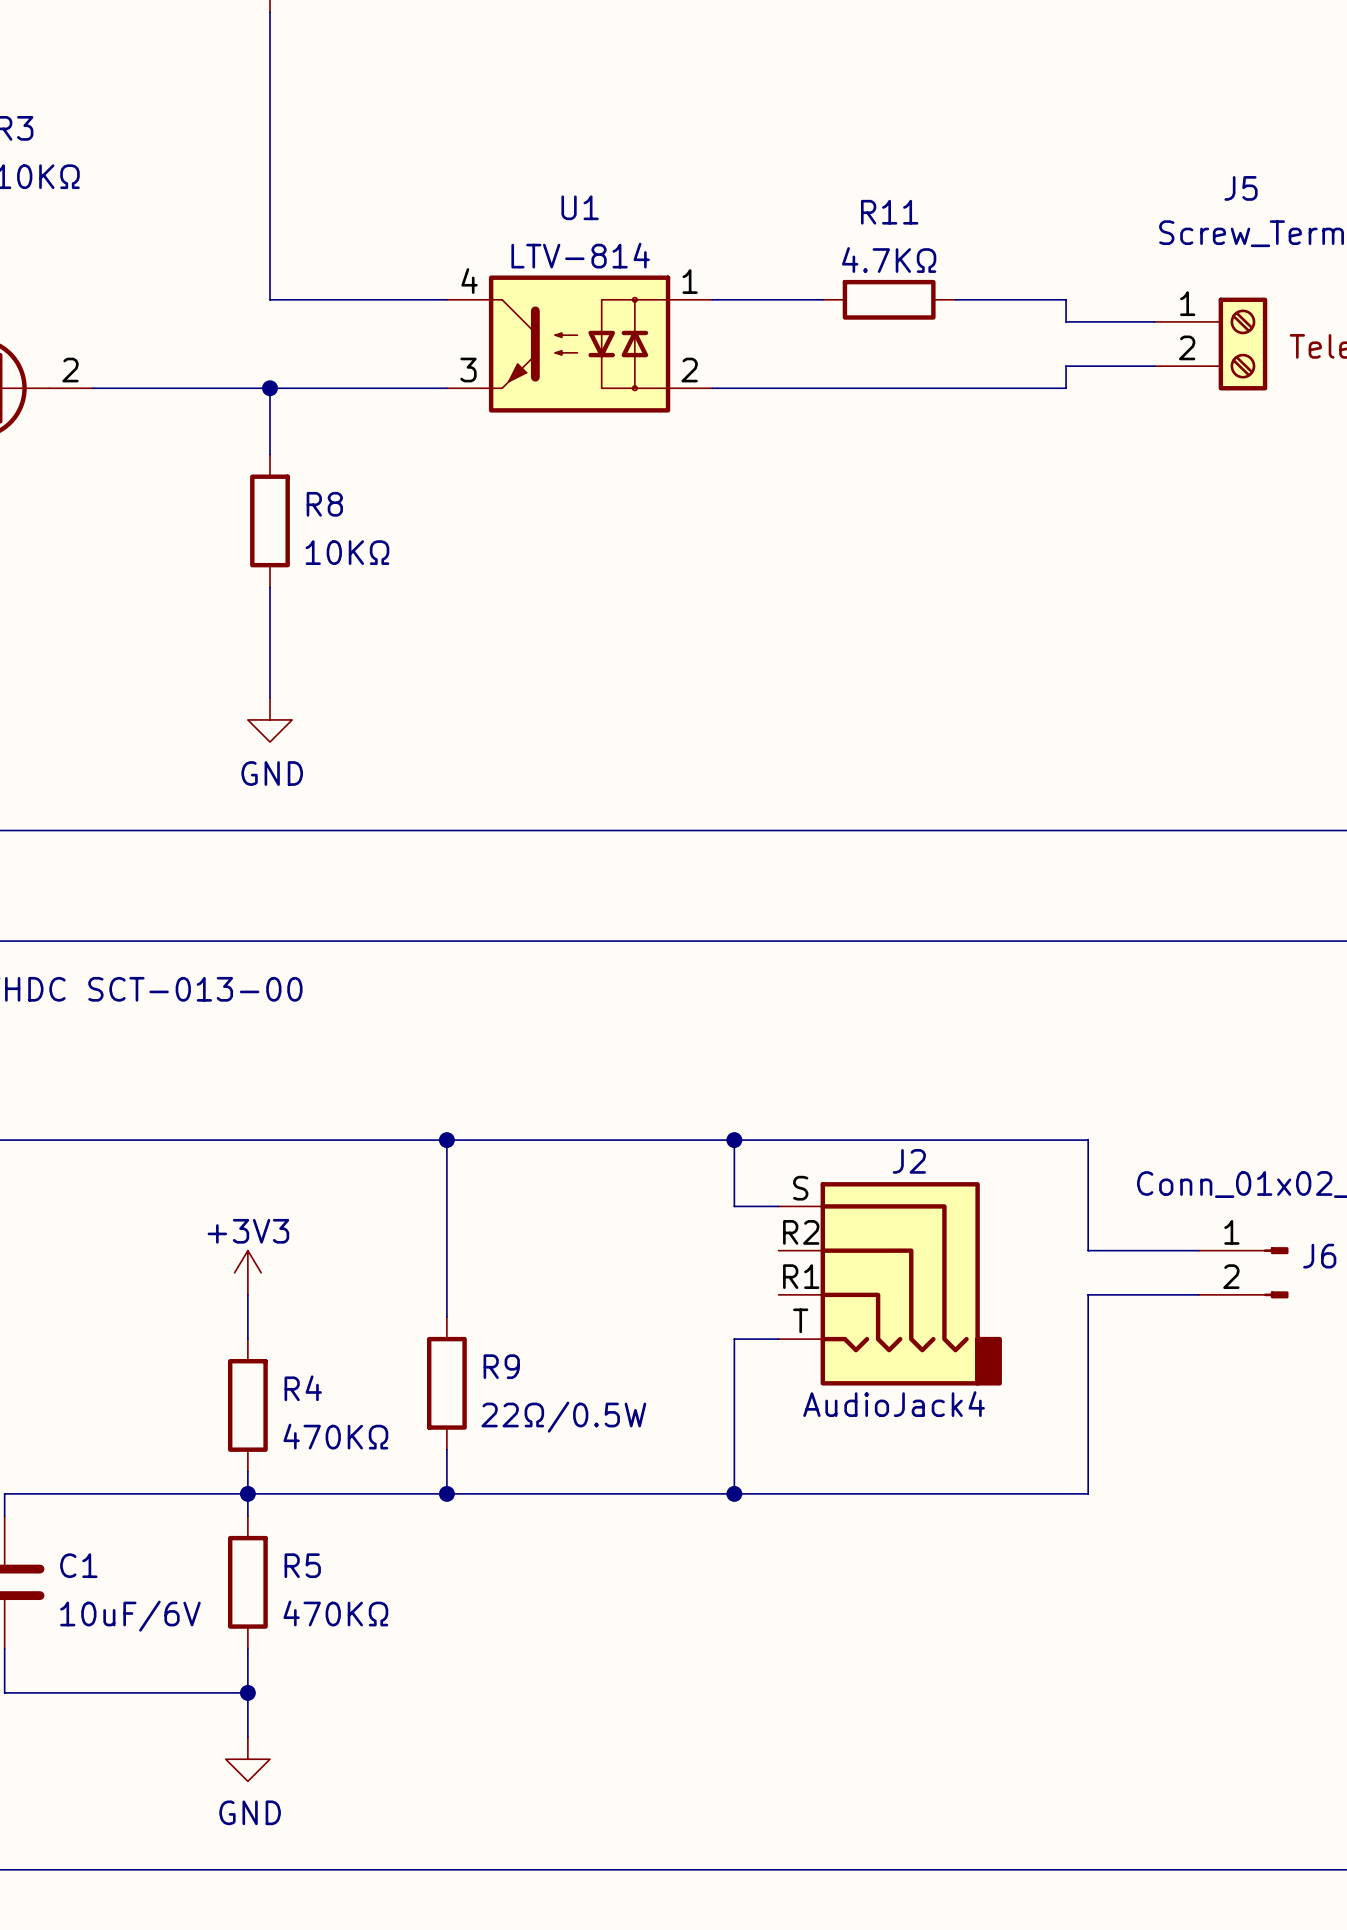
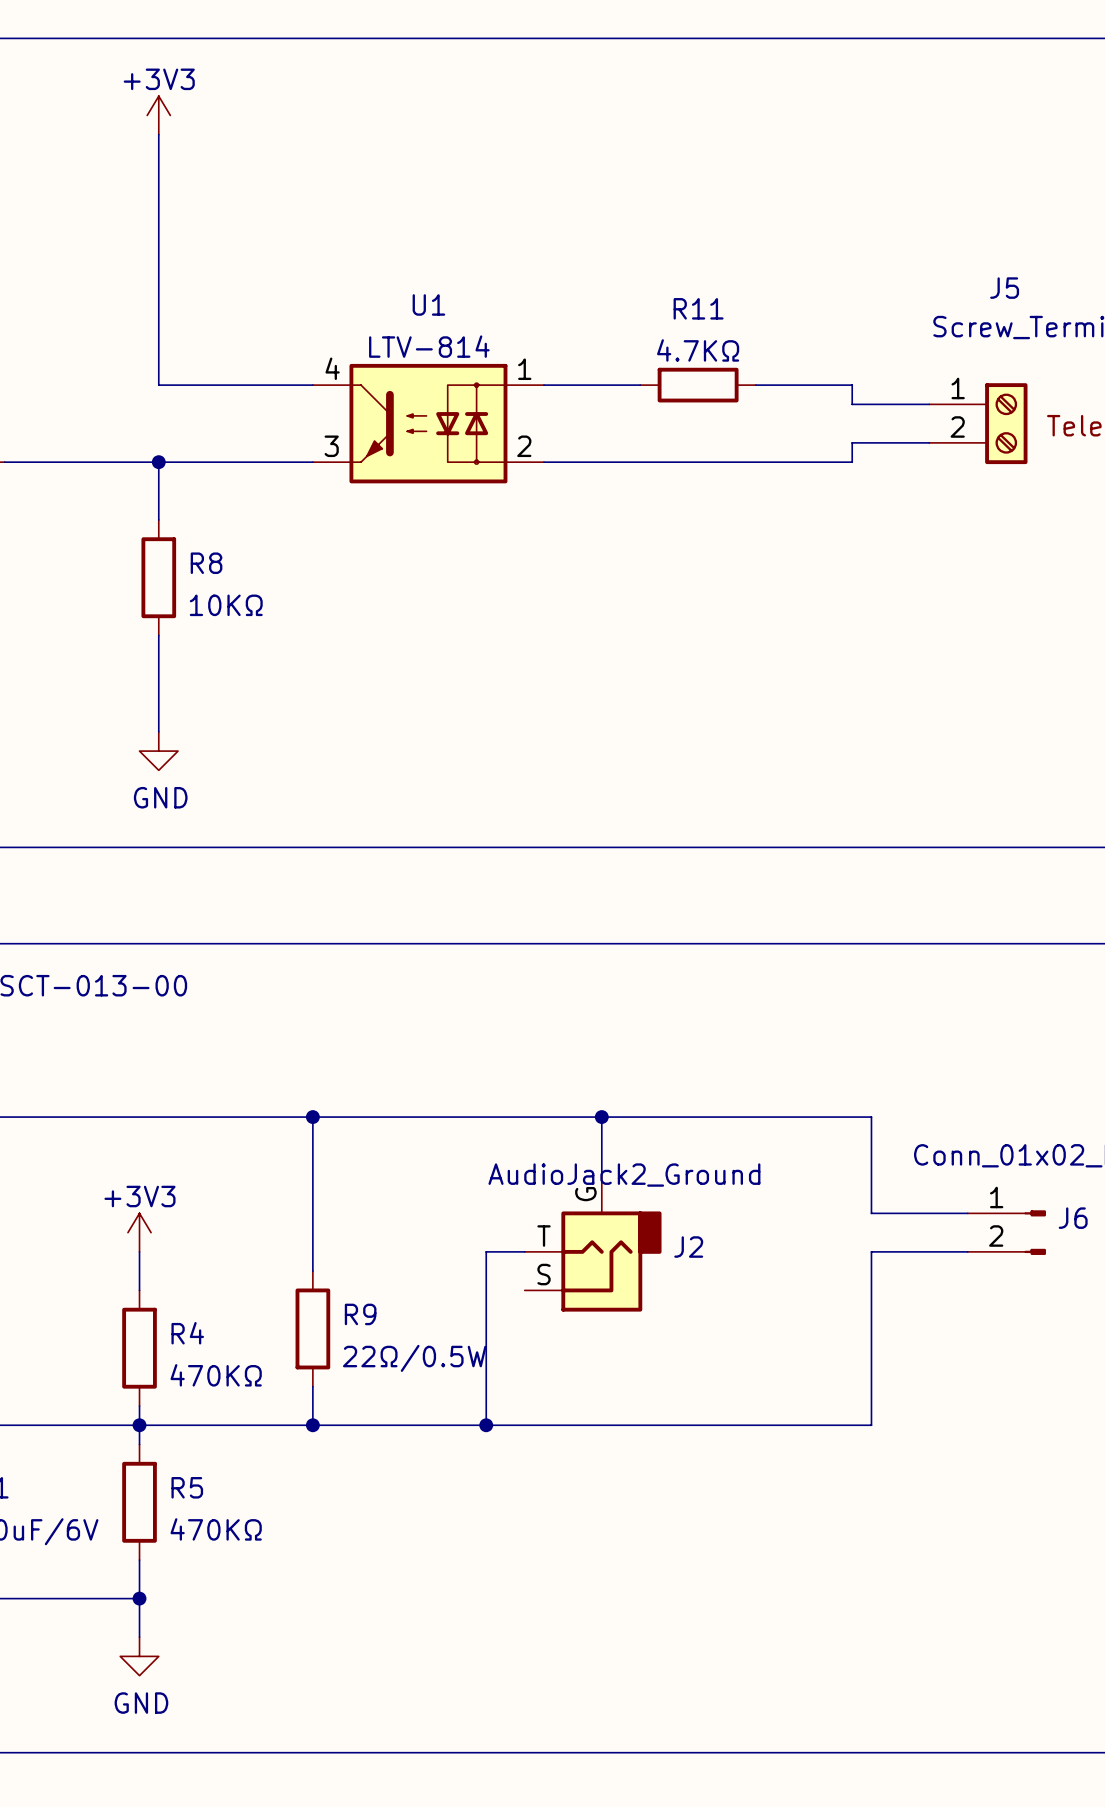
wire: (734, 1140) (734, 1206) (778, 1206) -> (601, 1117) (601, 1174)
junction position: (734, 1140) -> (601, 1117)
J2 name position: J2 (909, 1161) -> J2 (688, 1247)
J2 symbol: [778, 1182, 1002, 1386] -> [524, 1174, 662, 1312]
wire: none -> (524, 1251) (486, 1251) (486, 1425)
wire: (778, 1339) (734, 1339) (734, 1493) -> none
J2 value: AudioJack4 (894, 1404) -> AudioJack2_Ground (624, 1175)
junction position: (734, 1493) -> (486, 1425)

